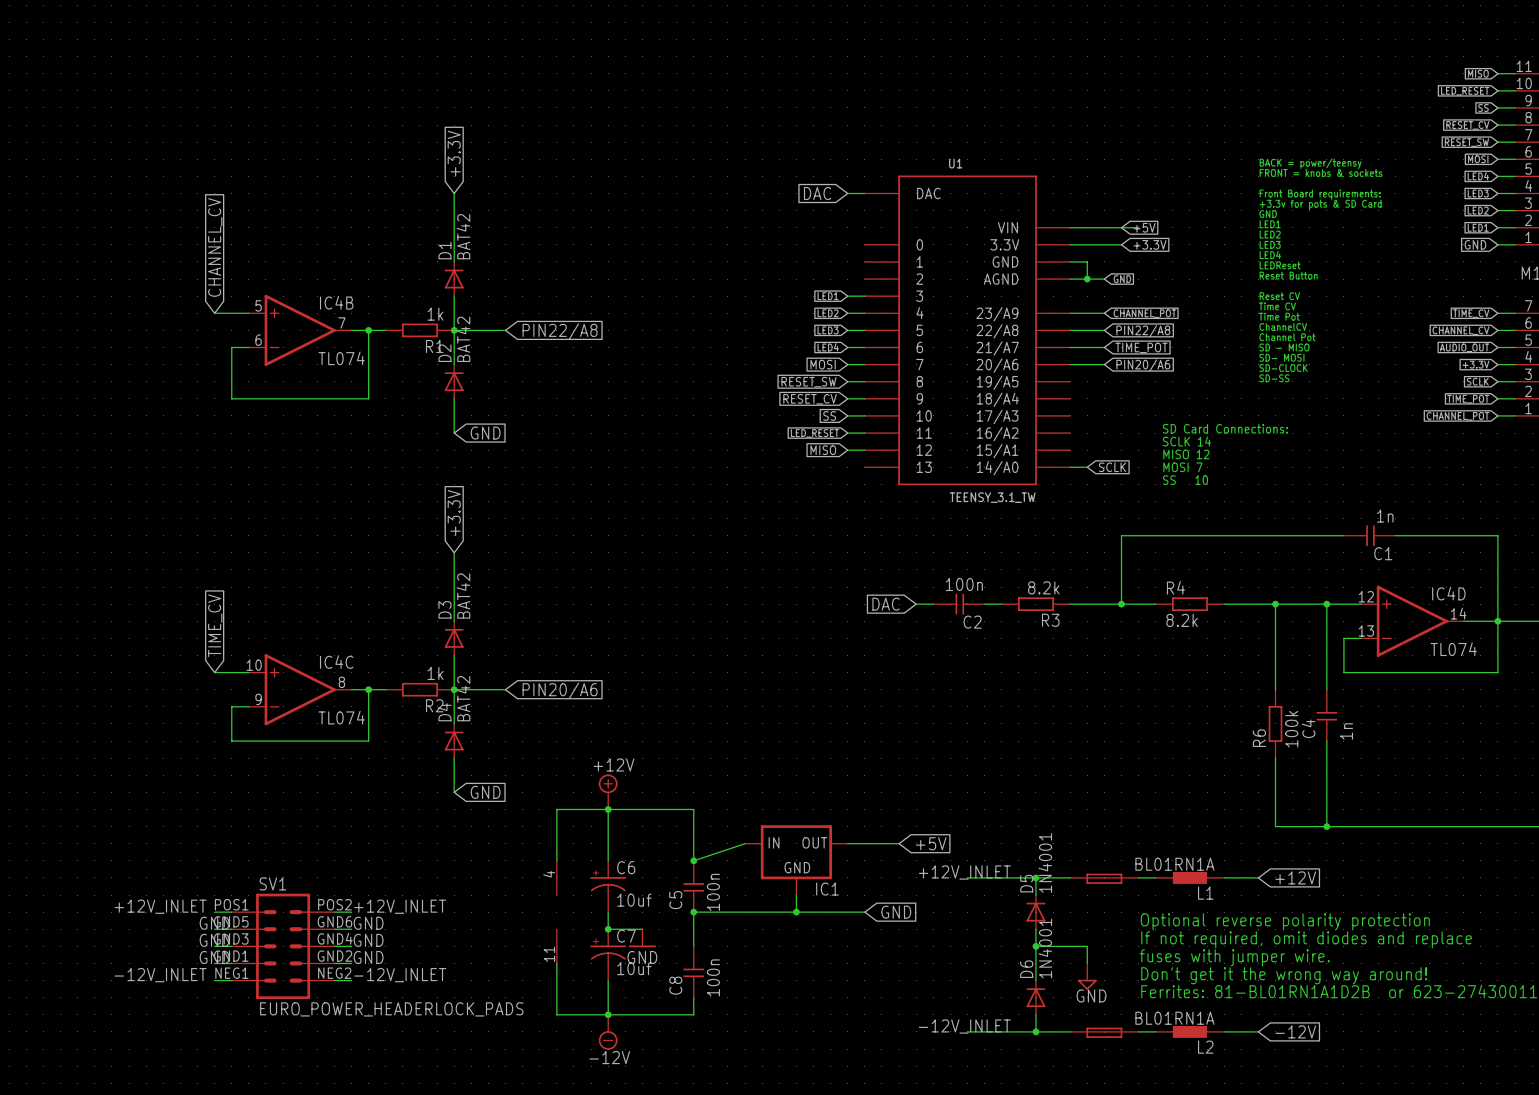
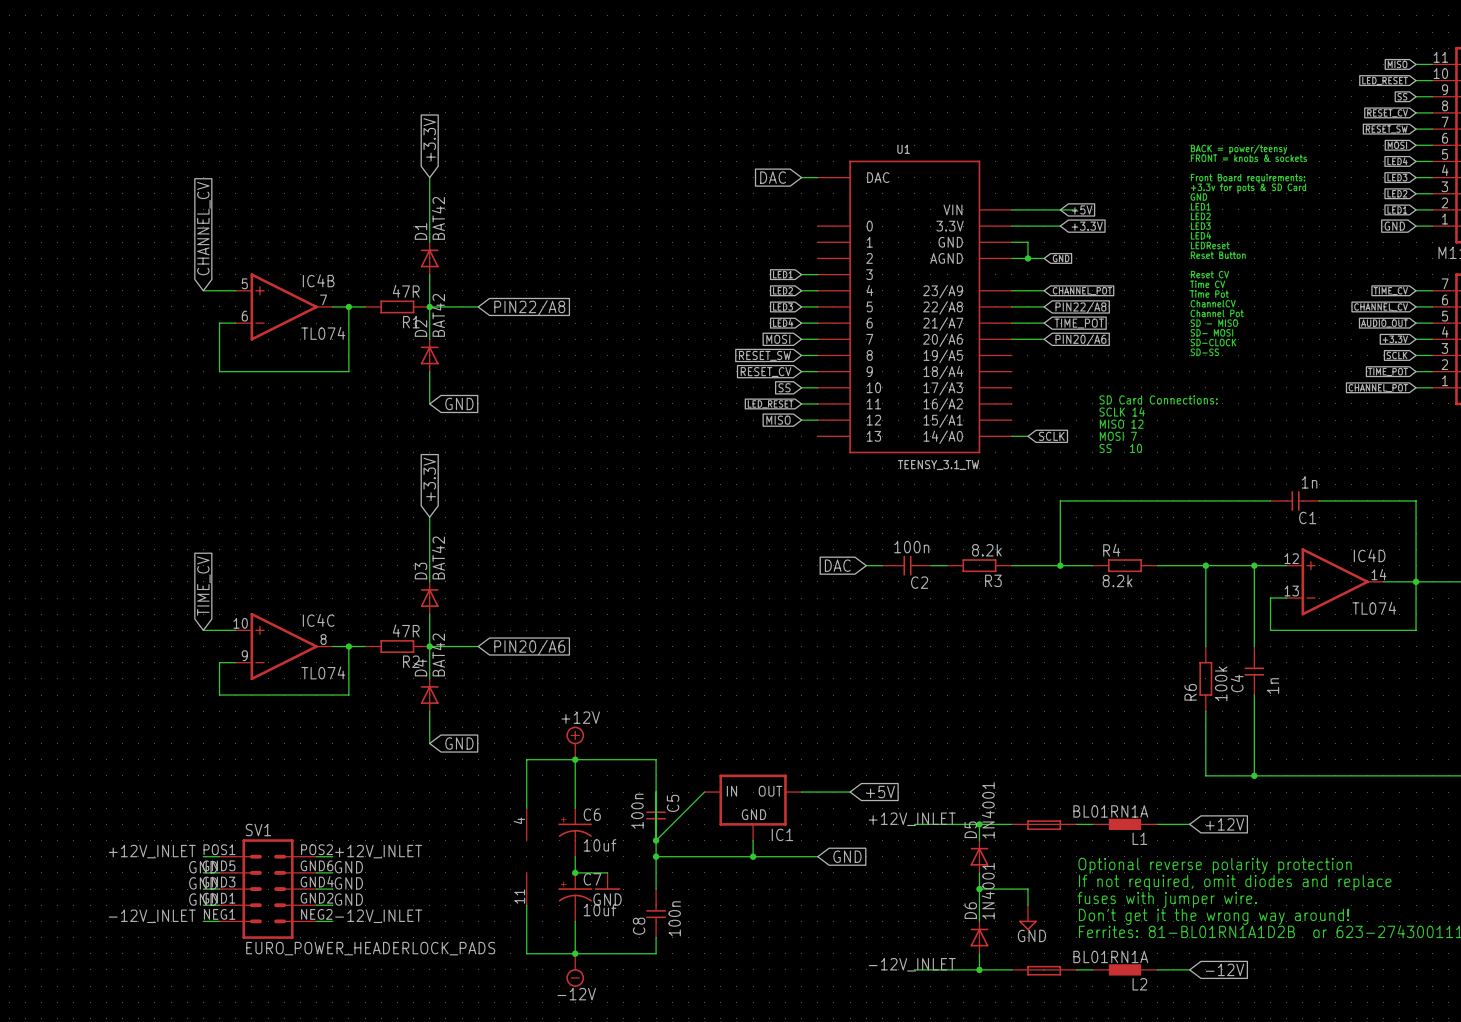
R1 value: 1k (435, 314) -> 47R (406, 291)
R2 value: 1k (435, 673) -> 47R (406, 630)
wire: (745, 843) (693, 860) -> (704, 792) (656, 840)
junction position: (693, 860) -> (656, 840)
C5 rotation: 0° (693, 886) -> 180° (656, 816)

